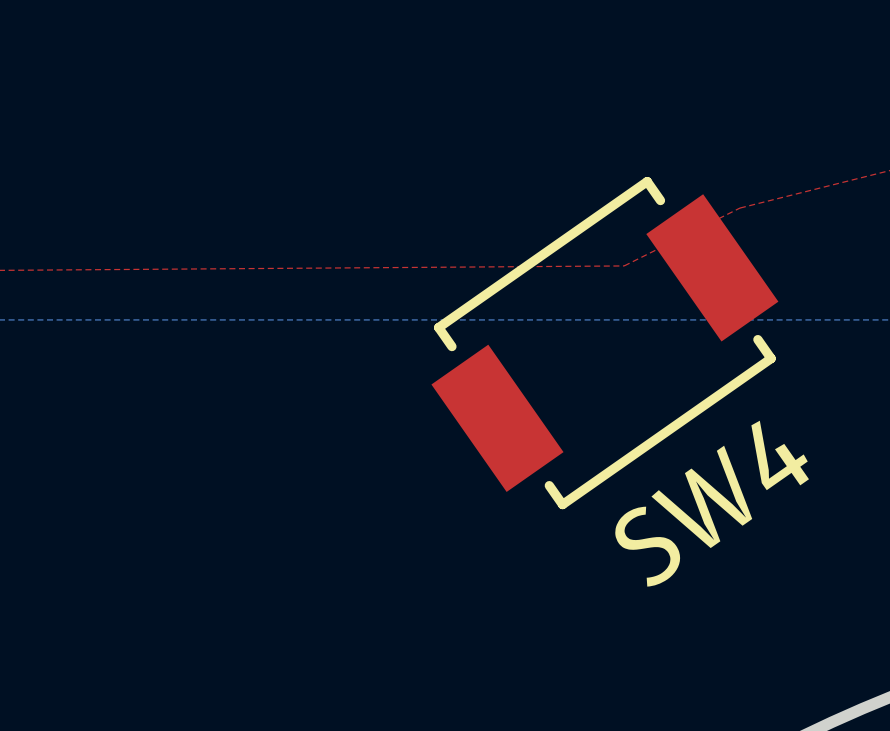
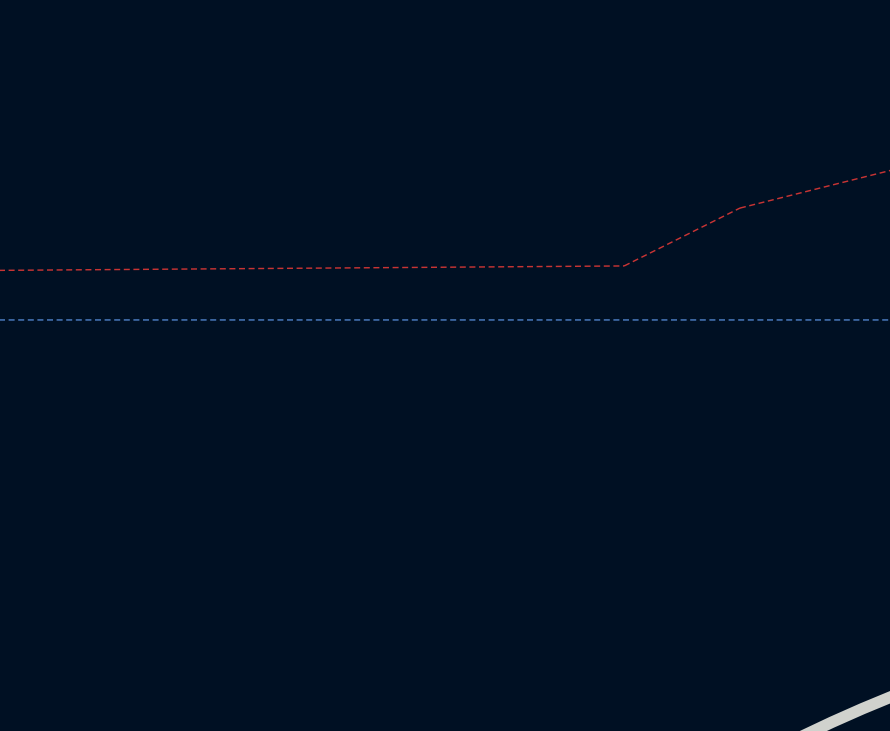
SW4: (604, 343) -> none

